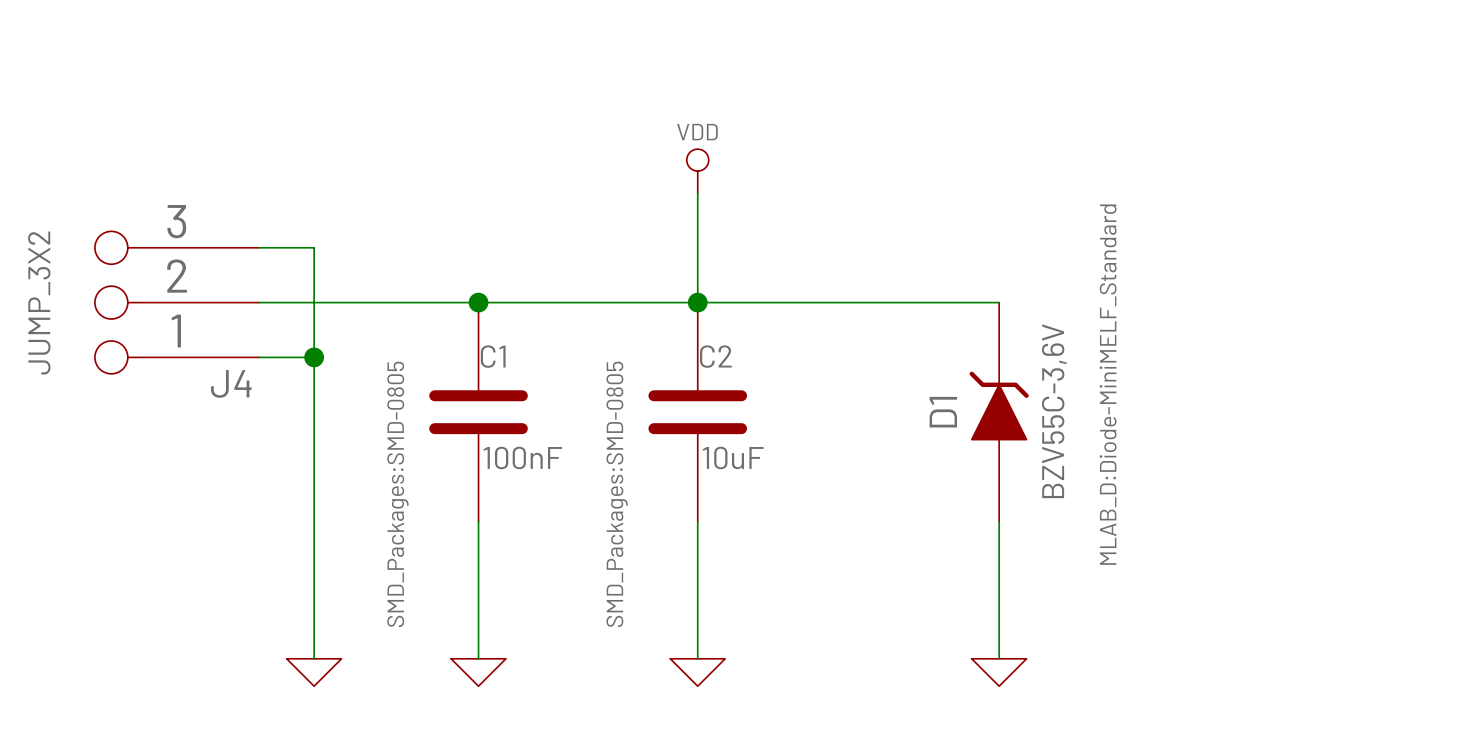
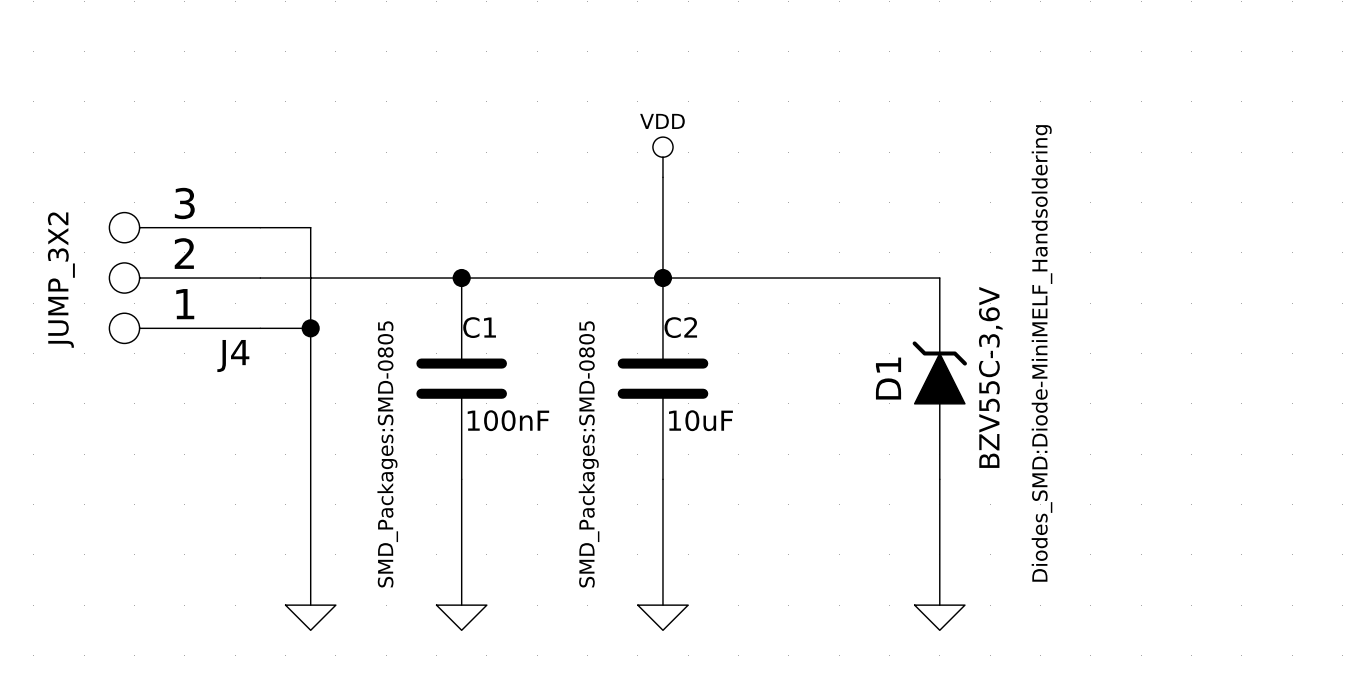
D1 text: MLAB_D:Diode-MiniMELF_Standard (1108, 384) -> Diodes_SMD:Diode-MiniMELF_Handsoldering (1041, 353)

